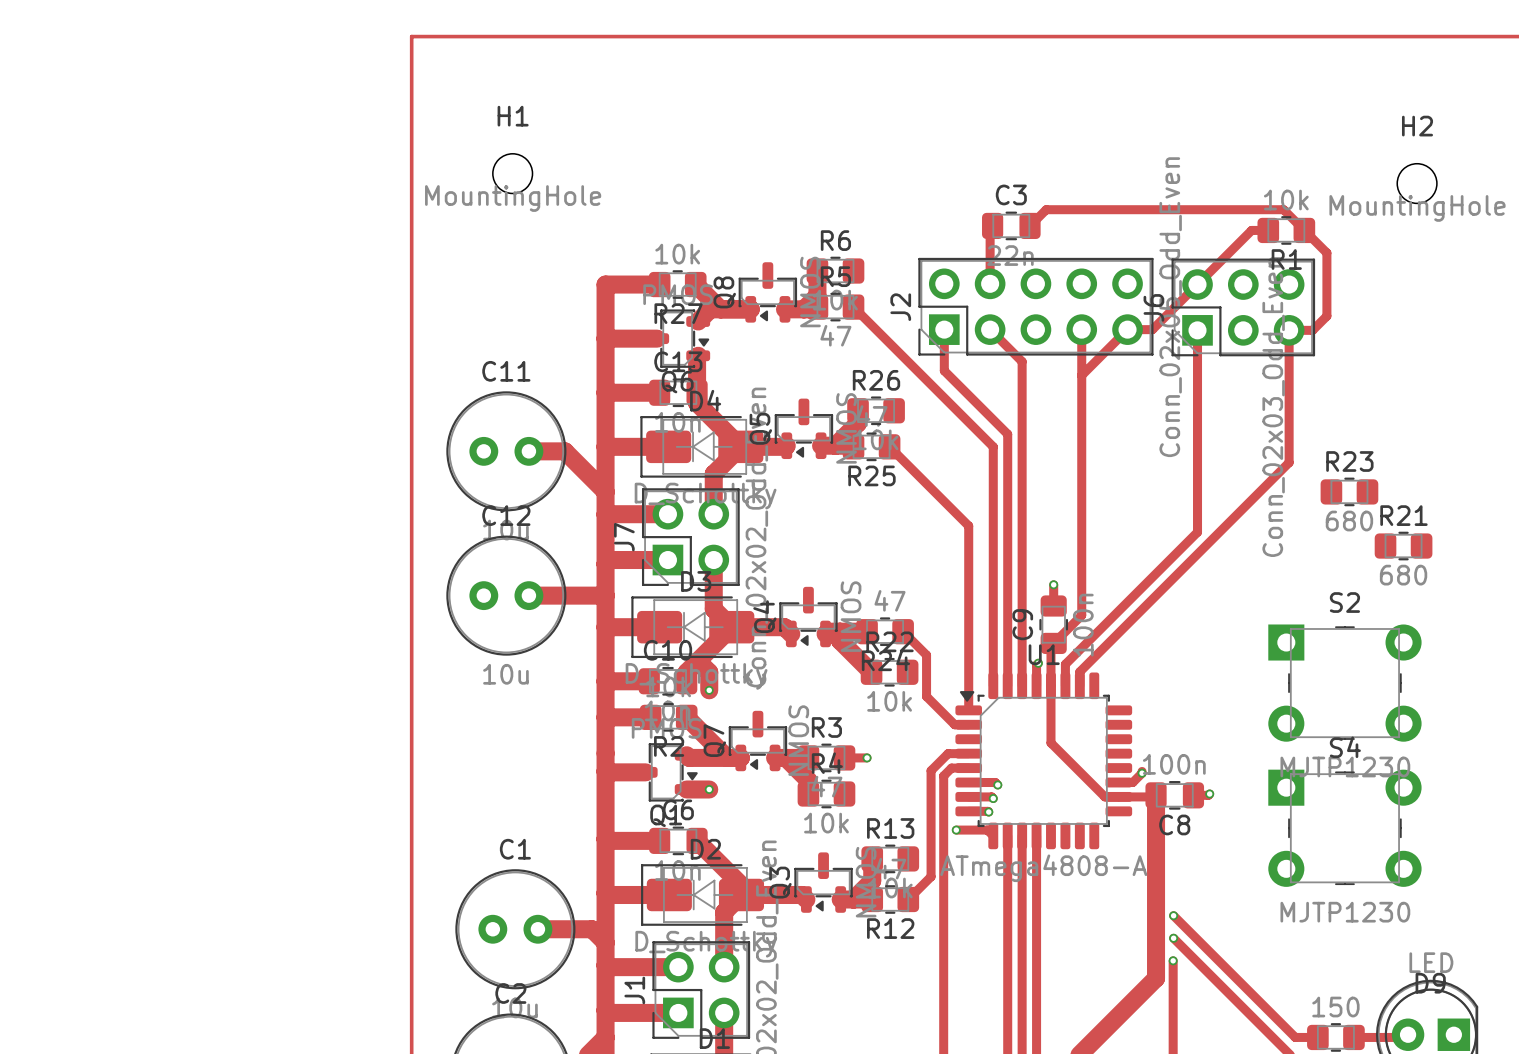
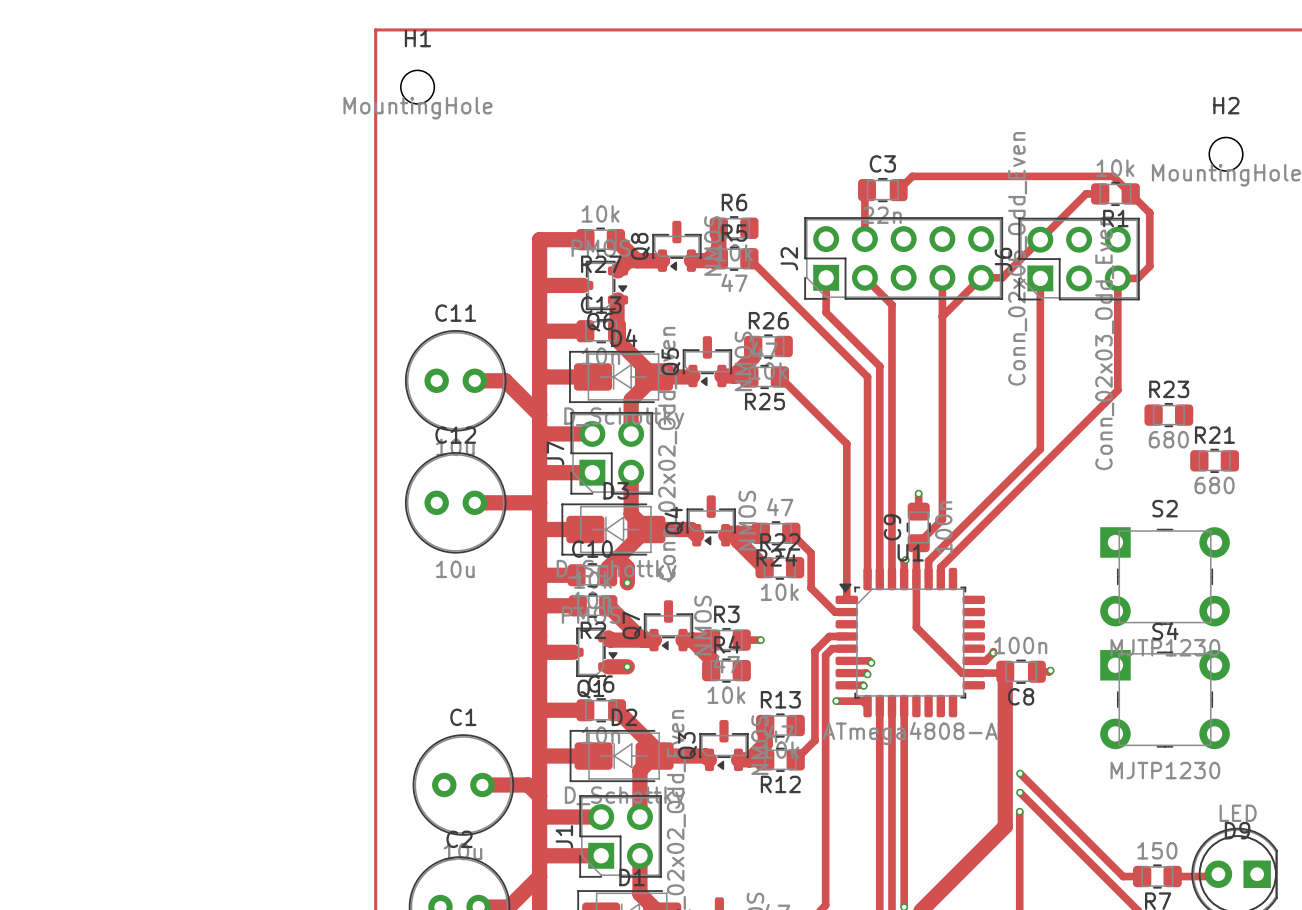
H1 position: (512, 173) -> (417, 87)

